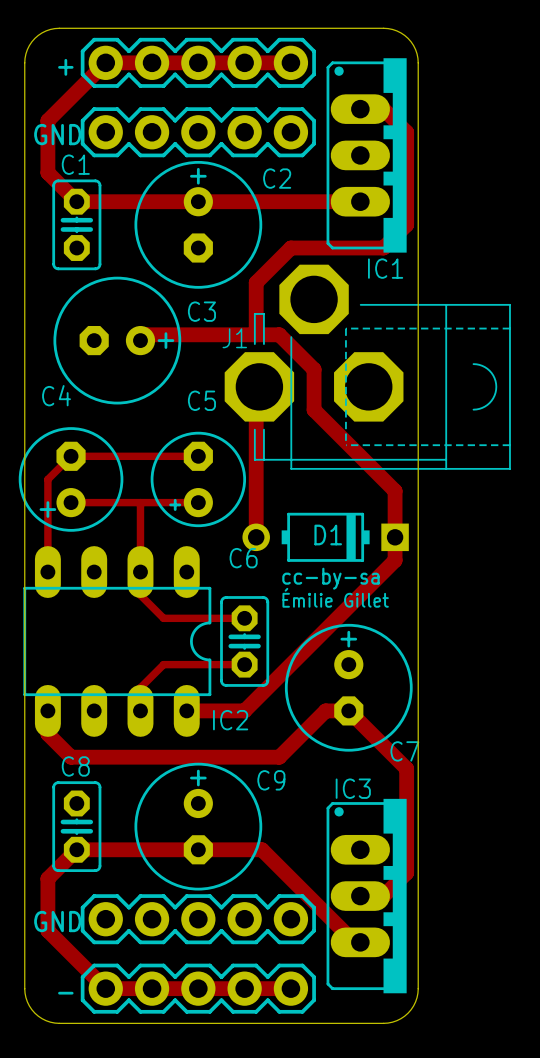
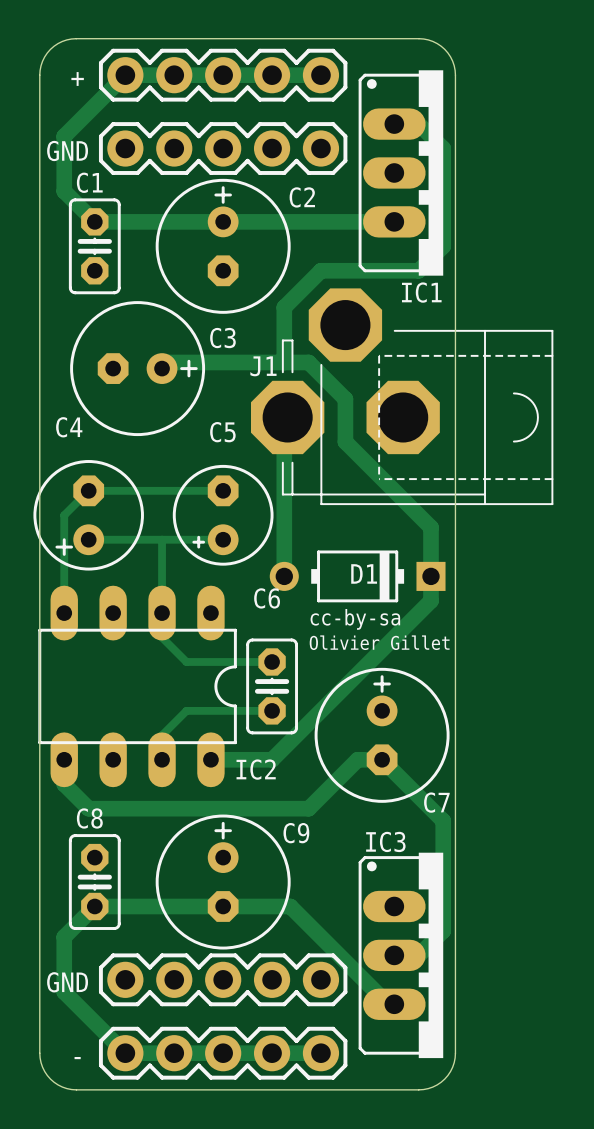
text: Émilie Gillet (335, 597) -> Olivier Gillet (379, 642)

